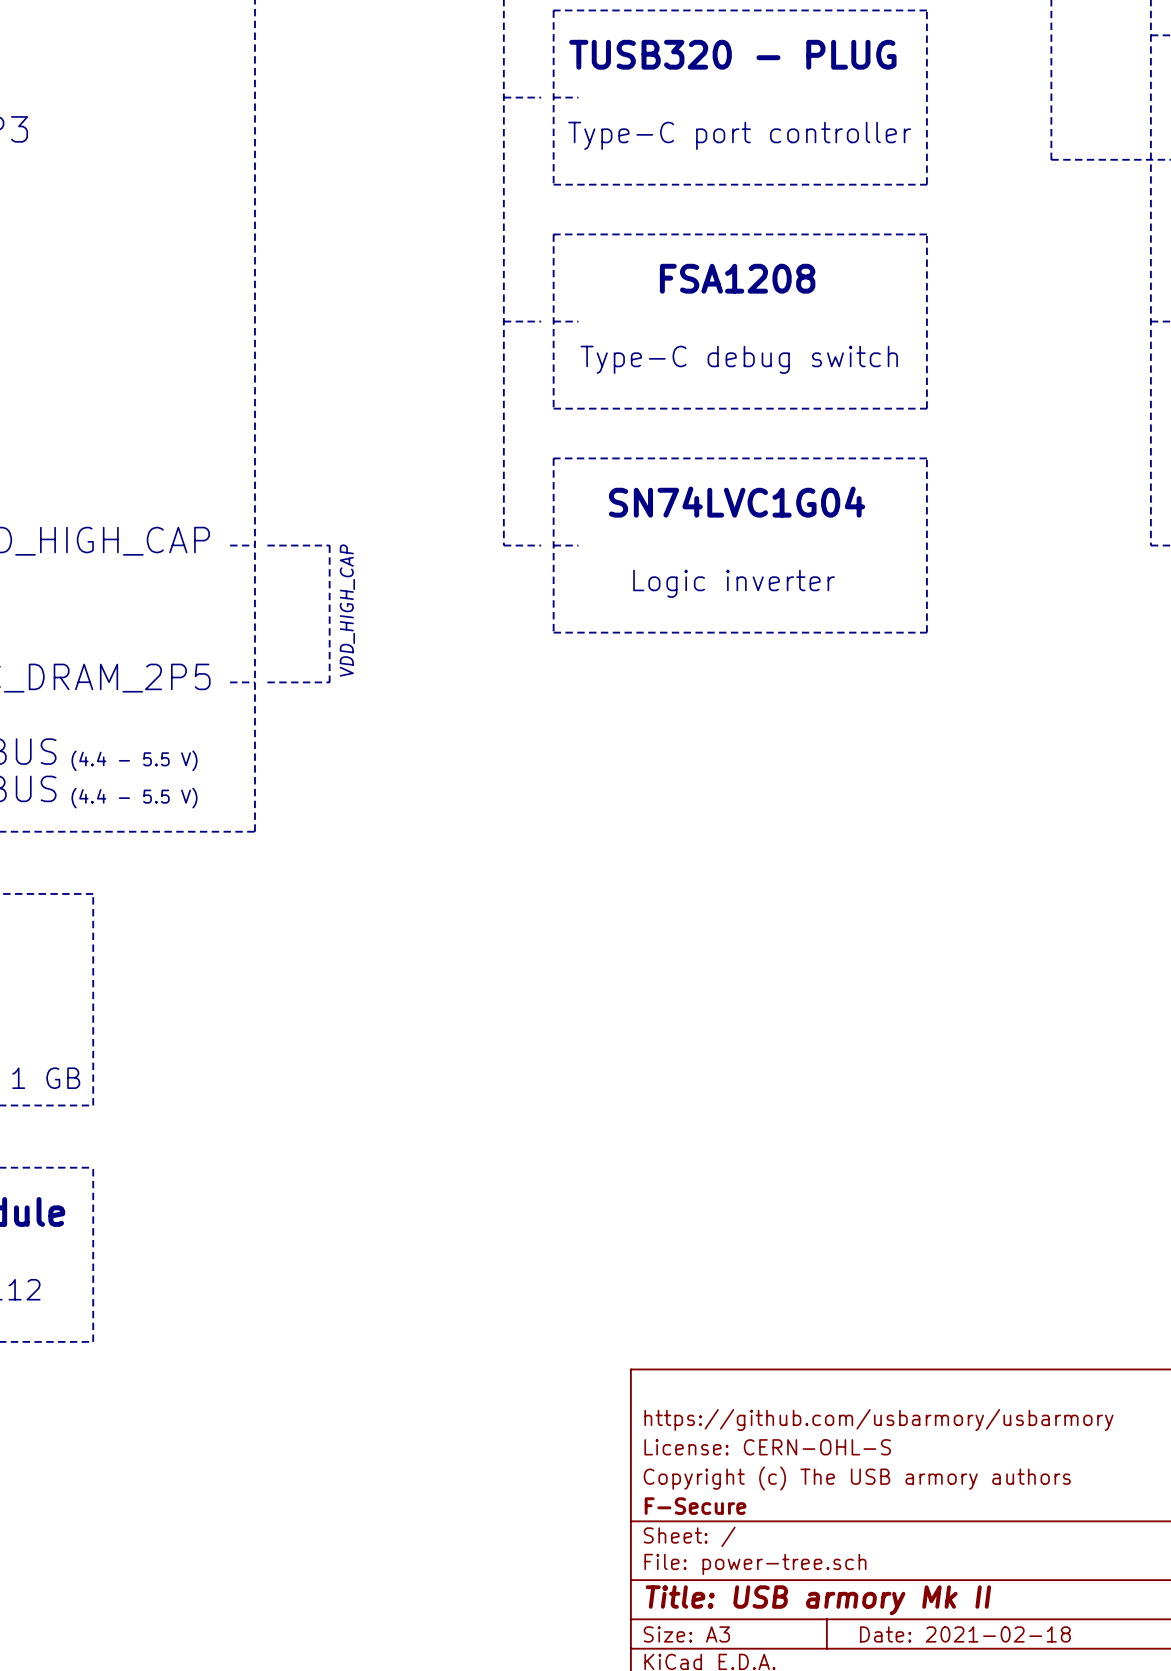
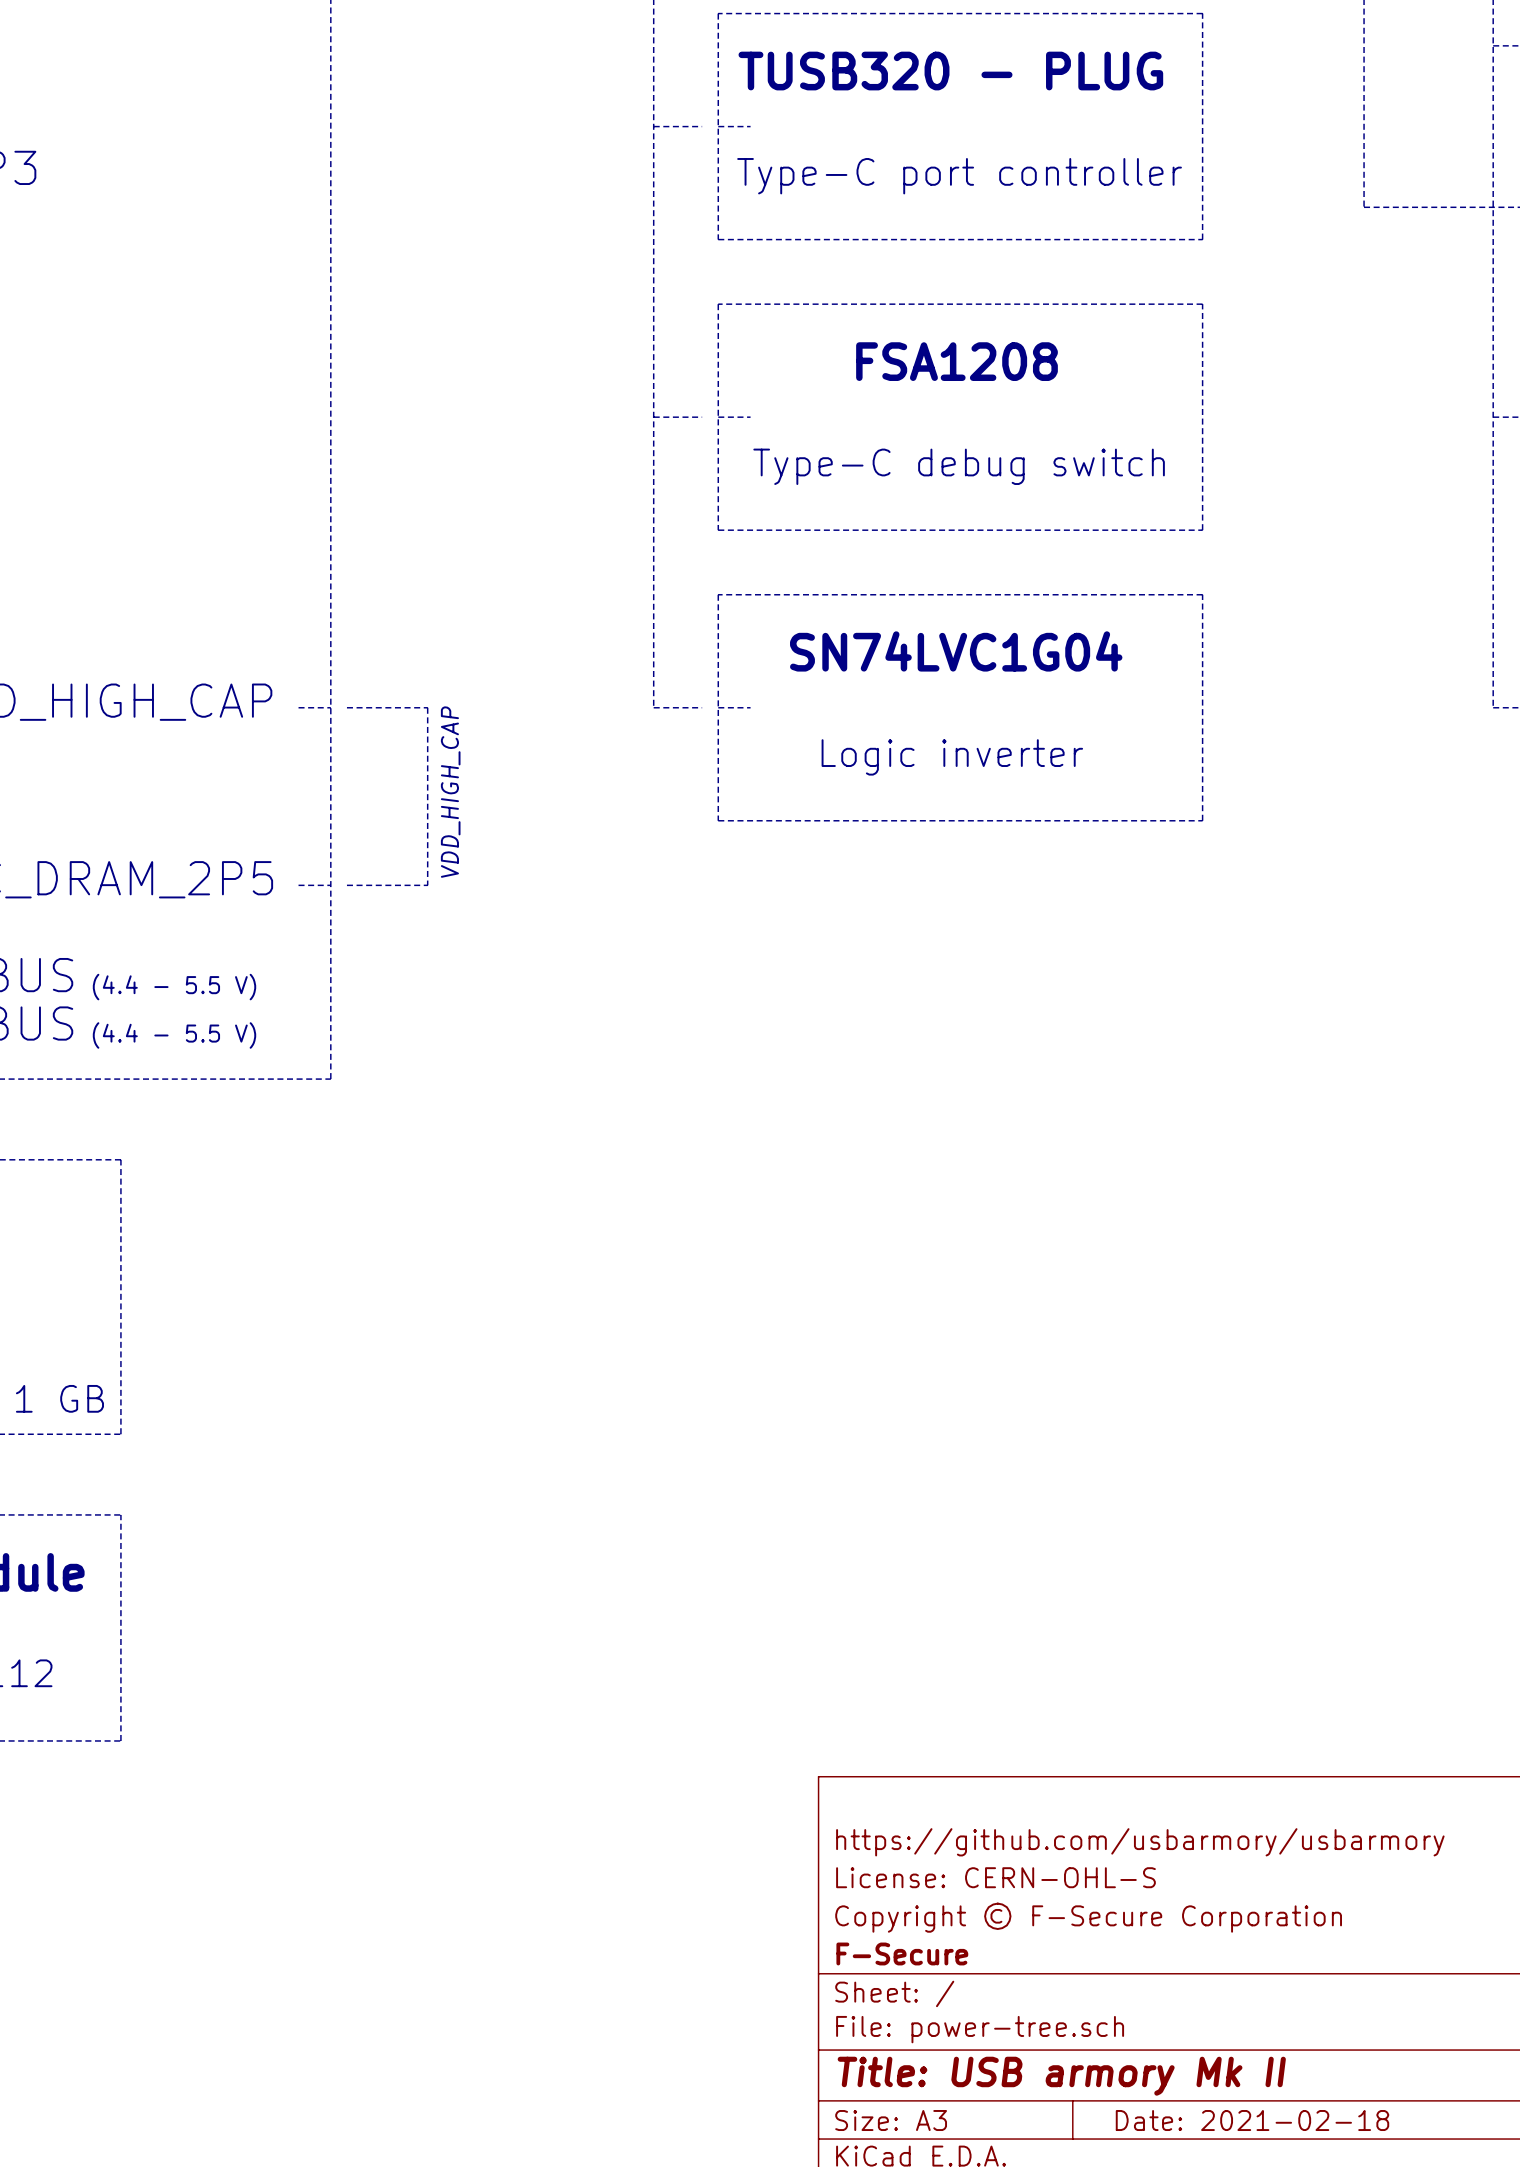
title block: Copyright (c) The USB armory authors (857, 1478) -> Copyright © F-Secure Corporation (1088, 1917)

